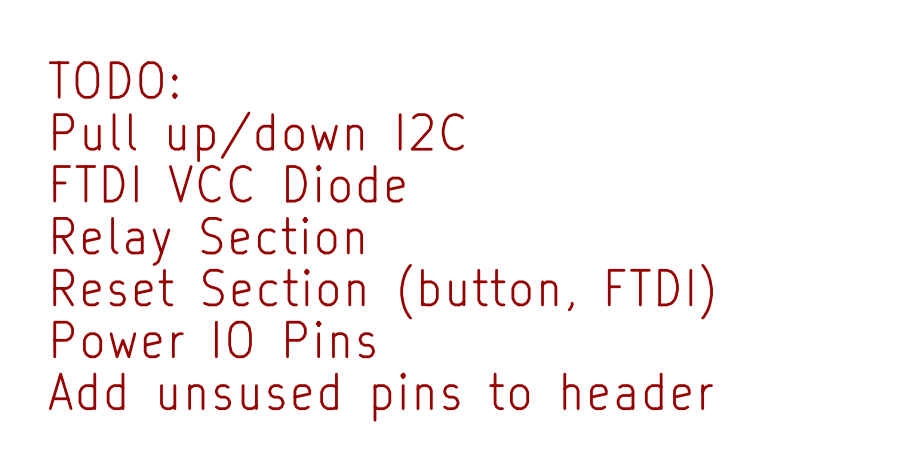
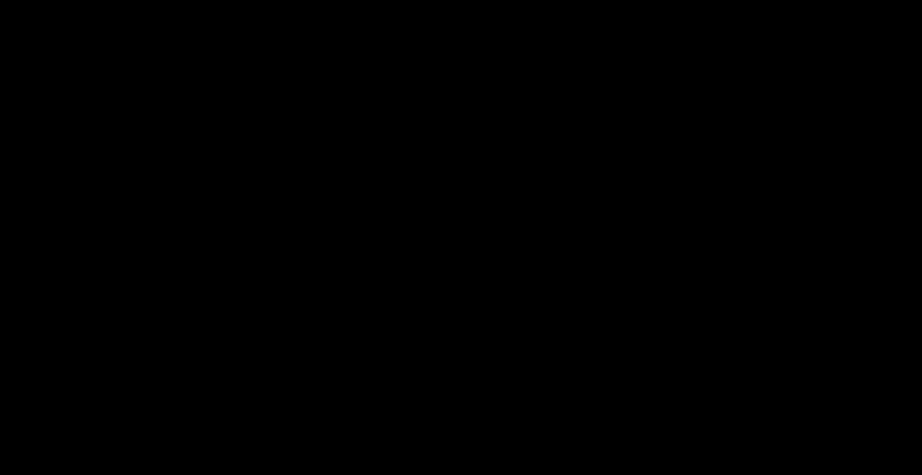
text: TODO: (113, 80) -> none
text: Pull up/down I2C (258, 136) -> none
text: FTDI VCC Diode (228, 183) -> none
text: Relay Section (208, 241) -> none
text: Reset Section (button, FTDI) (383, 291) -> none
text: Power IO Pins (214, 339) -> none
text: Add unsused pins to header (380, 397) -> none

